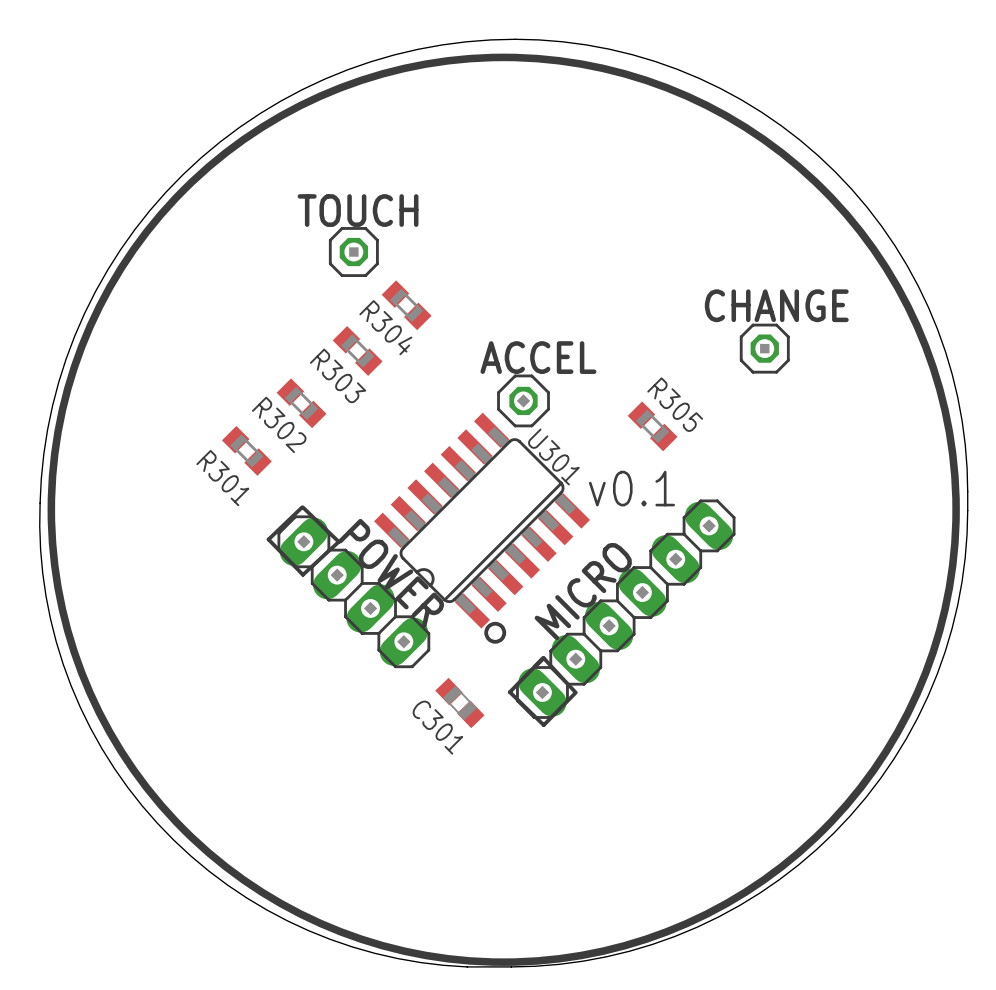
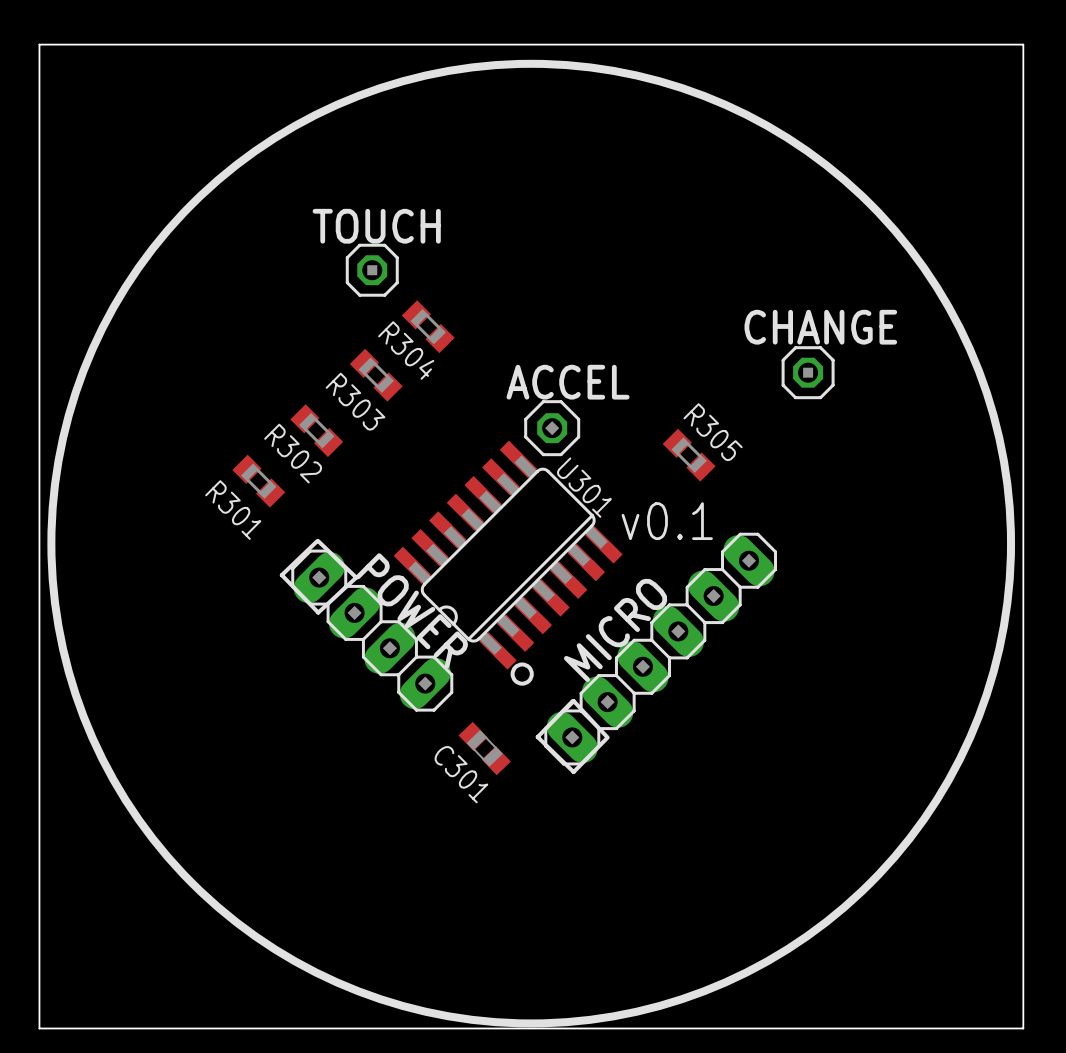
board edge: (967, 491) (962, 420) (945, 351) (928, 307) (894, 245) (851, 188) (800, 140) (741, 99) (677, 69) (609, 49) (538, 39) (466, 41) (417, 49) (347, 69) (280, 101) (239, 127) (183, 174) (134, 229) (95, 291) (66, 359) (52, 406) (41, 478) (40, 549) (50, 619) (63, 663) (90, 728) (127, 787) (173, 840) (227, 885) (287, 920) (352, 947) (420, 962) (467, 966) -> (1023, 524) (1023, 44) (39, 44) (39, 1028) (492, 1028)
board edge: (967, 510) (965, 558) (957, 605) (945, 651) (928, 696) (906, 738) (880, 778) (833, 833) (798, 865) (759, 893) (718, 917) (674, 936) (606, 956) (559, 964) (511, 966) -> (1023, 544) (1023, 1028) (539, 1028)

